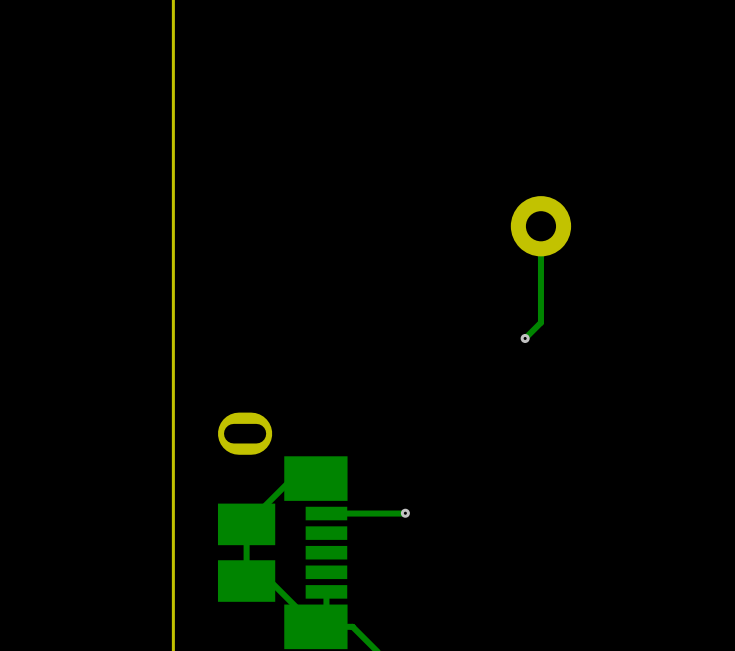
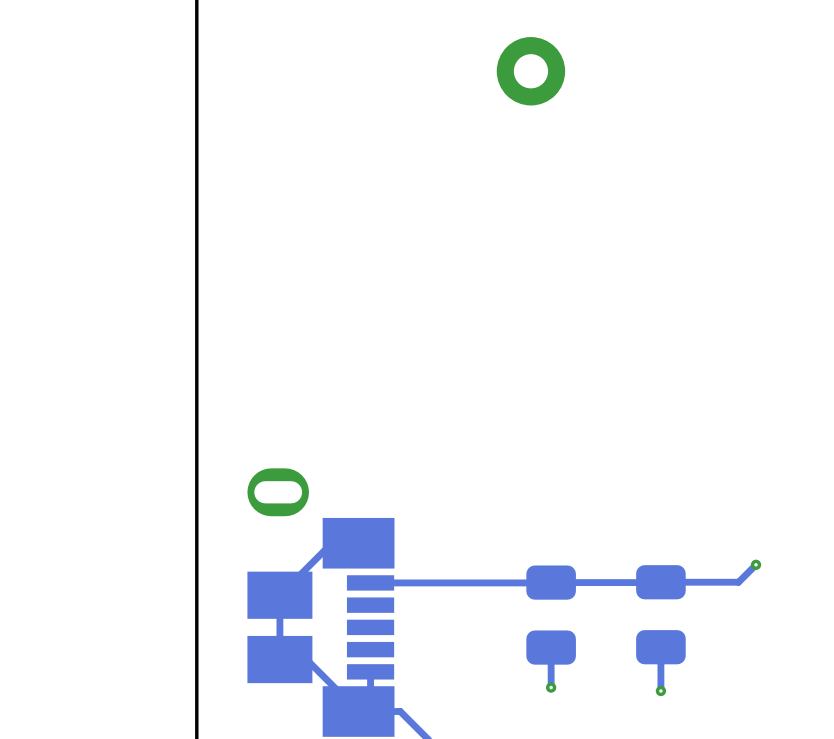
bottom track: (540, 226) (540, 322) (525, 338) -> none
part position: (540, 226) -> (530, 71)
via: (525, 338) -> none
bottom track: none -> (756, 564) (738, 582) (660, 582)
via: none -> (756, 564)
bottom track: none -> (459, 582) (550, 582)
via: (405, 513) -> none
bottom track: none -> (551, 582) (660, 582)
part: none -> (551, 615)
part: none -> (660, 614)
bottom track: none -> (551, 647) (551, 687)
bottom track: none -> (660, 647) (660, 691)
via: none -> (551, 687)
via: none -> (660, 691)

